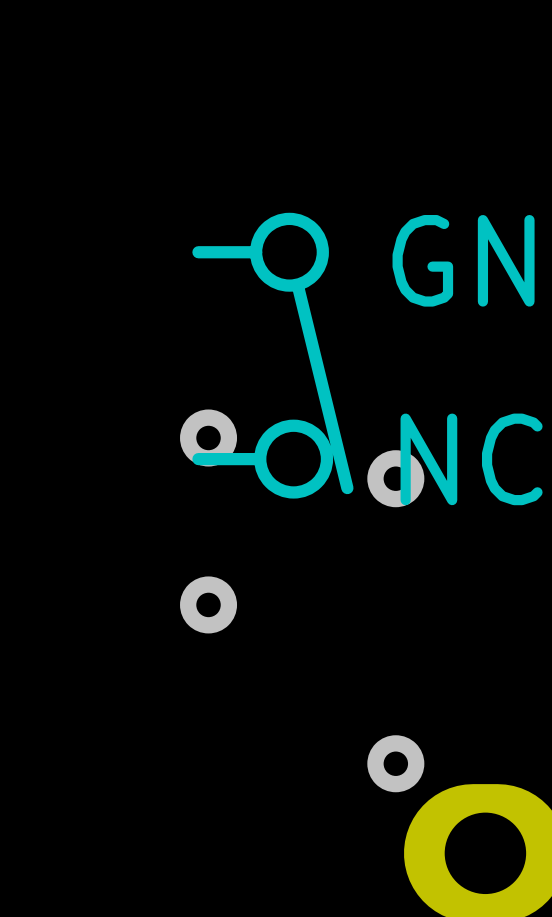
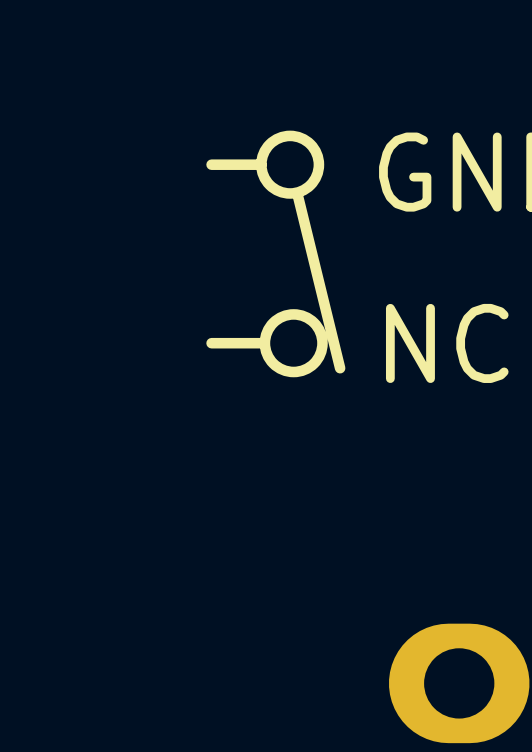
via: (208, 437) -> none
via: (395, 478) -> none
via: (208, 604) -> none
via: (395, 763) -> none

